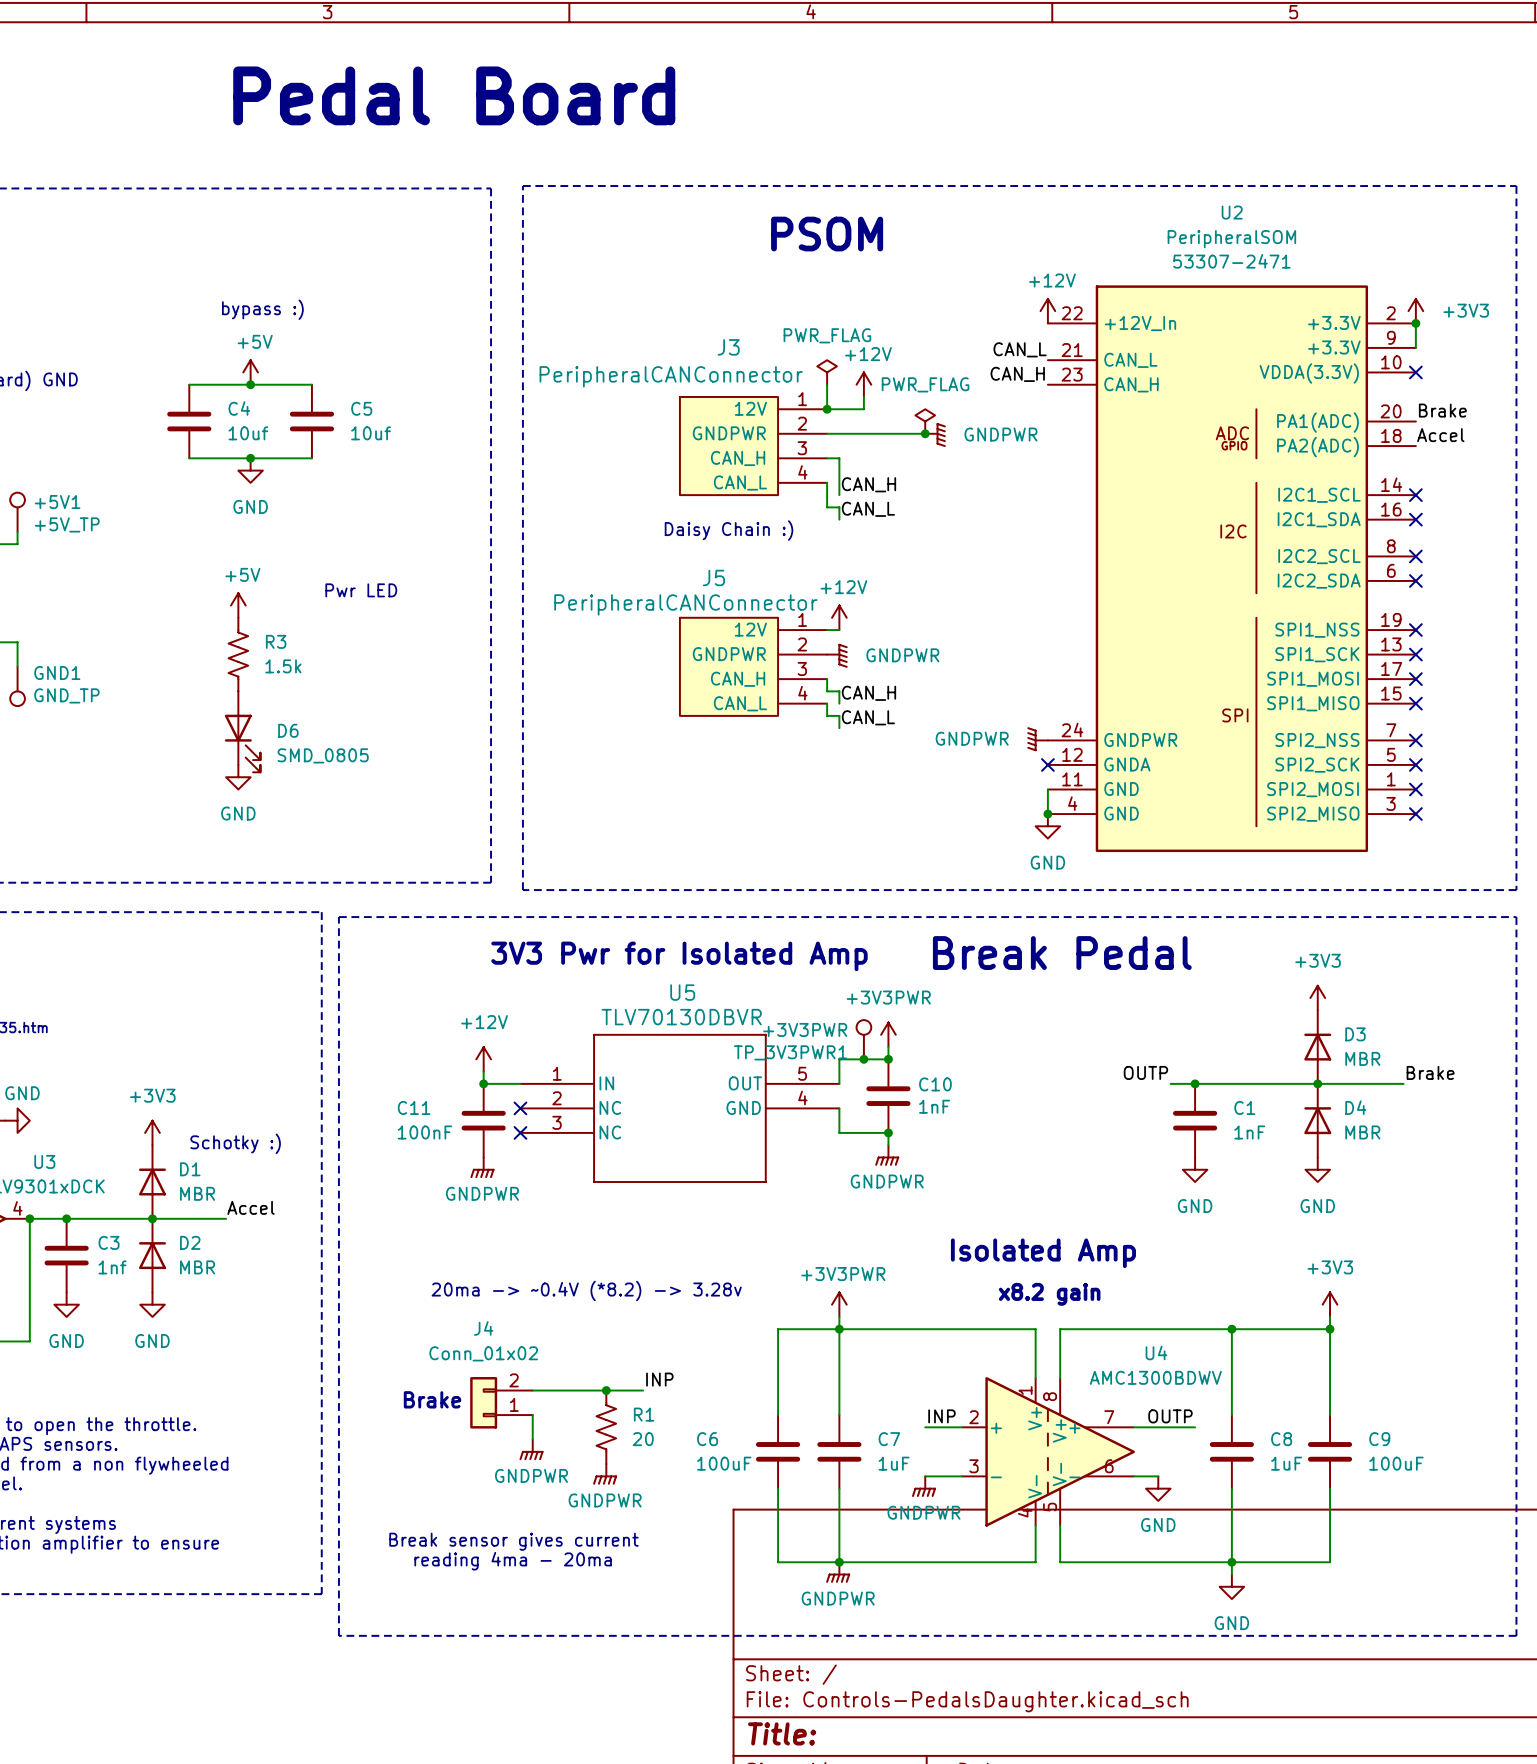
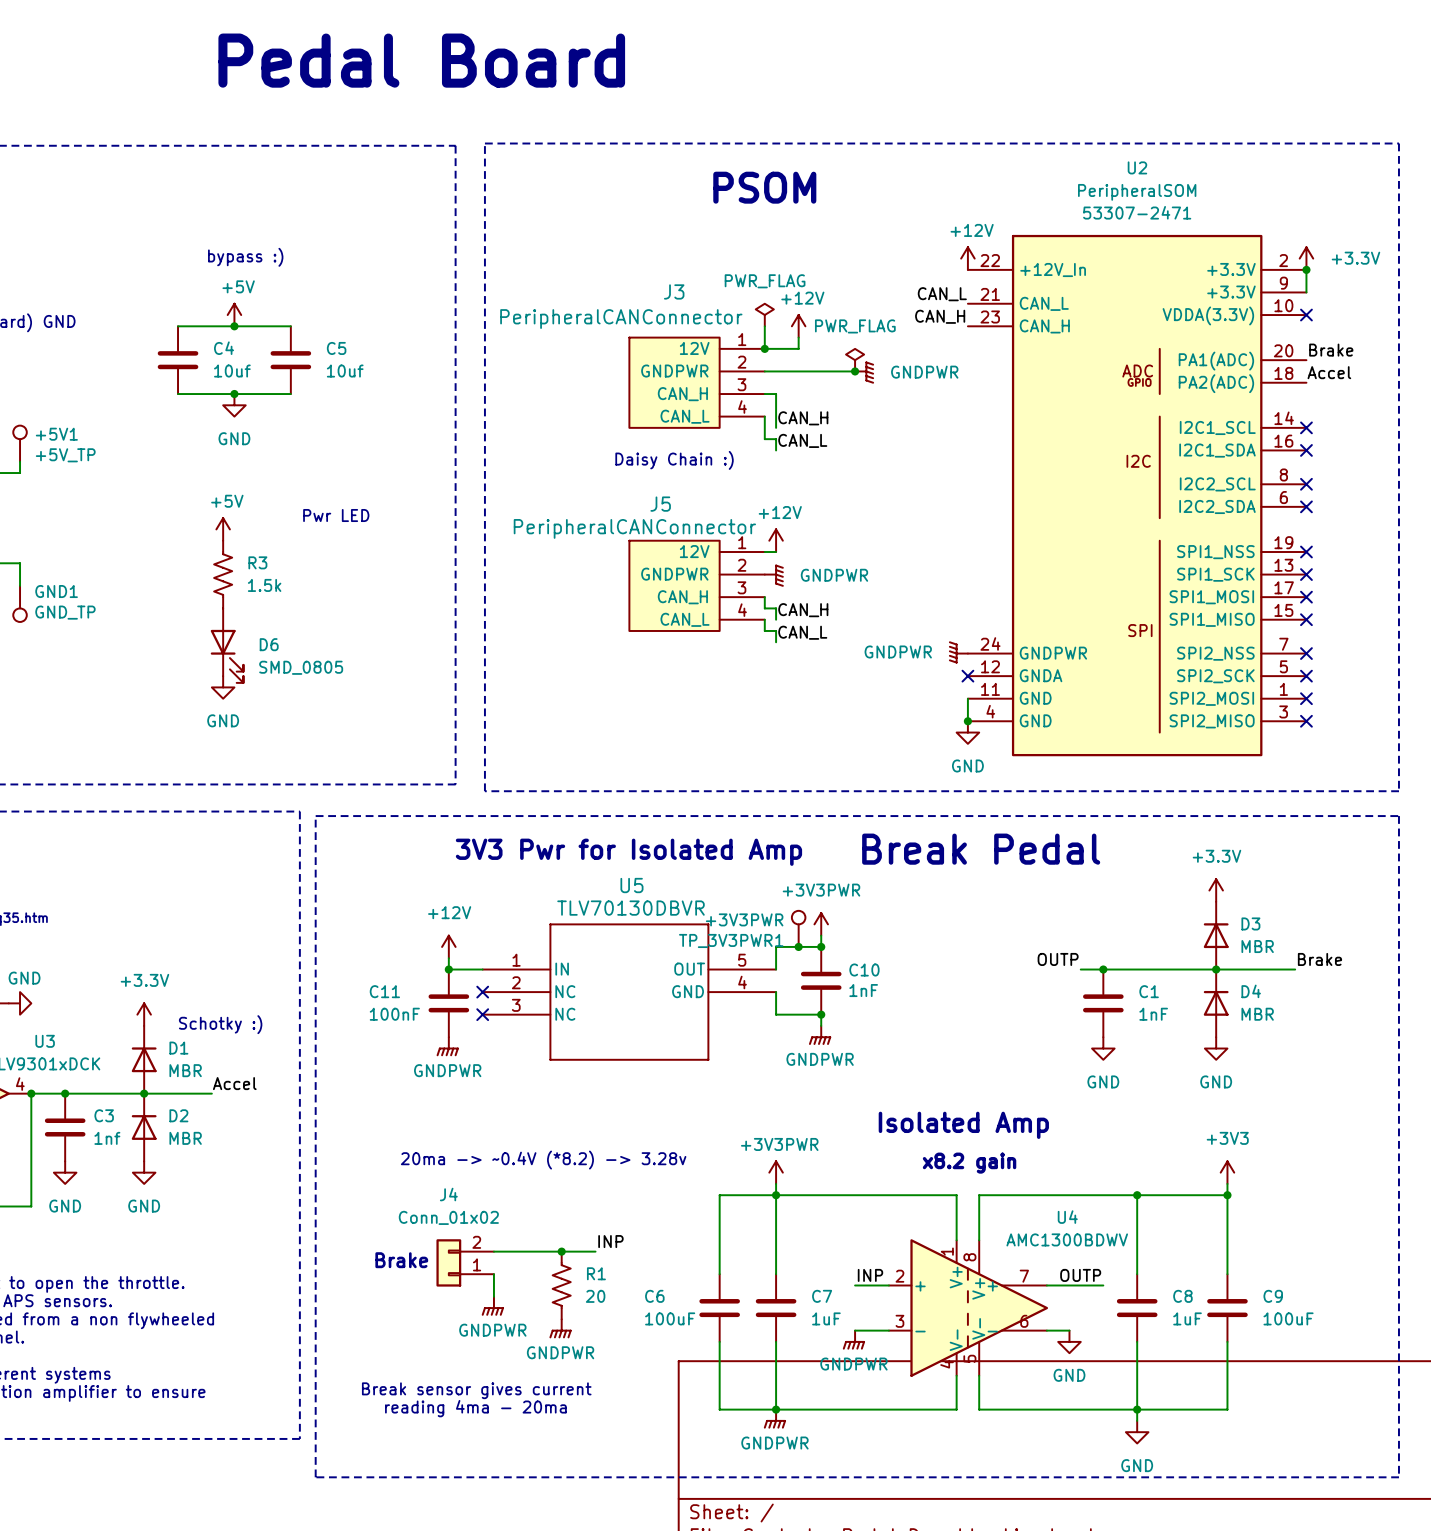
power symbol: +3V3 (1415, 311) -> +3.3V (1306, 258)
power symbol: +3V3 (1317, 998) -> +3.3V (1216, 890)
power symbol: +3V3 (152, 1132) -> +3.3V (144, 1014)

